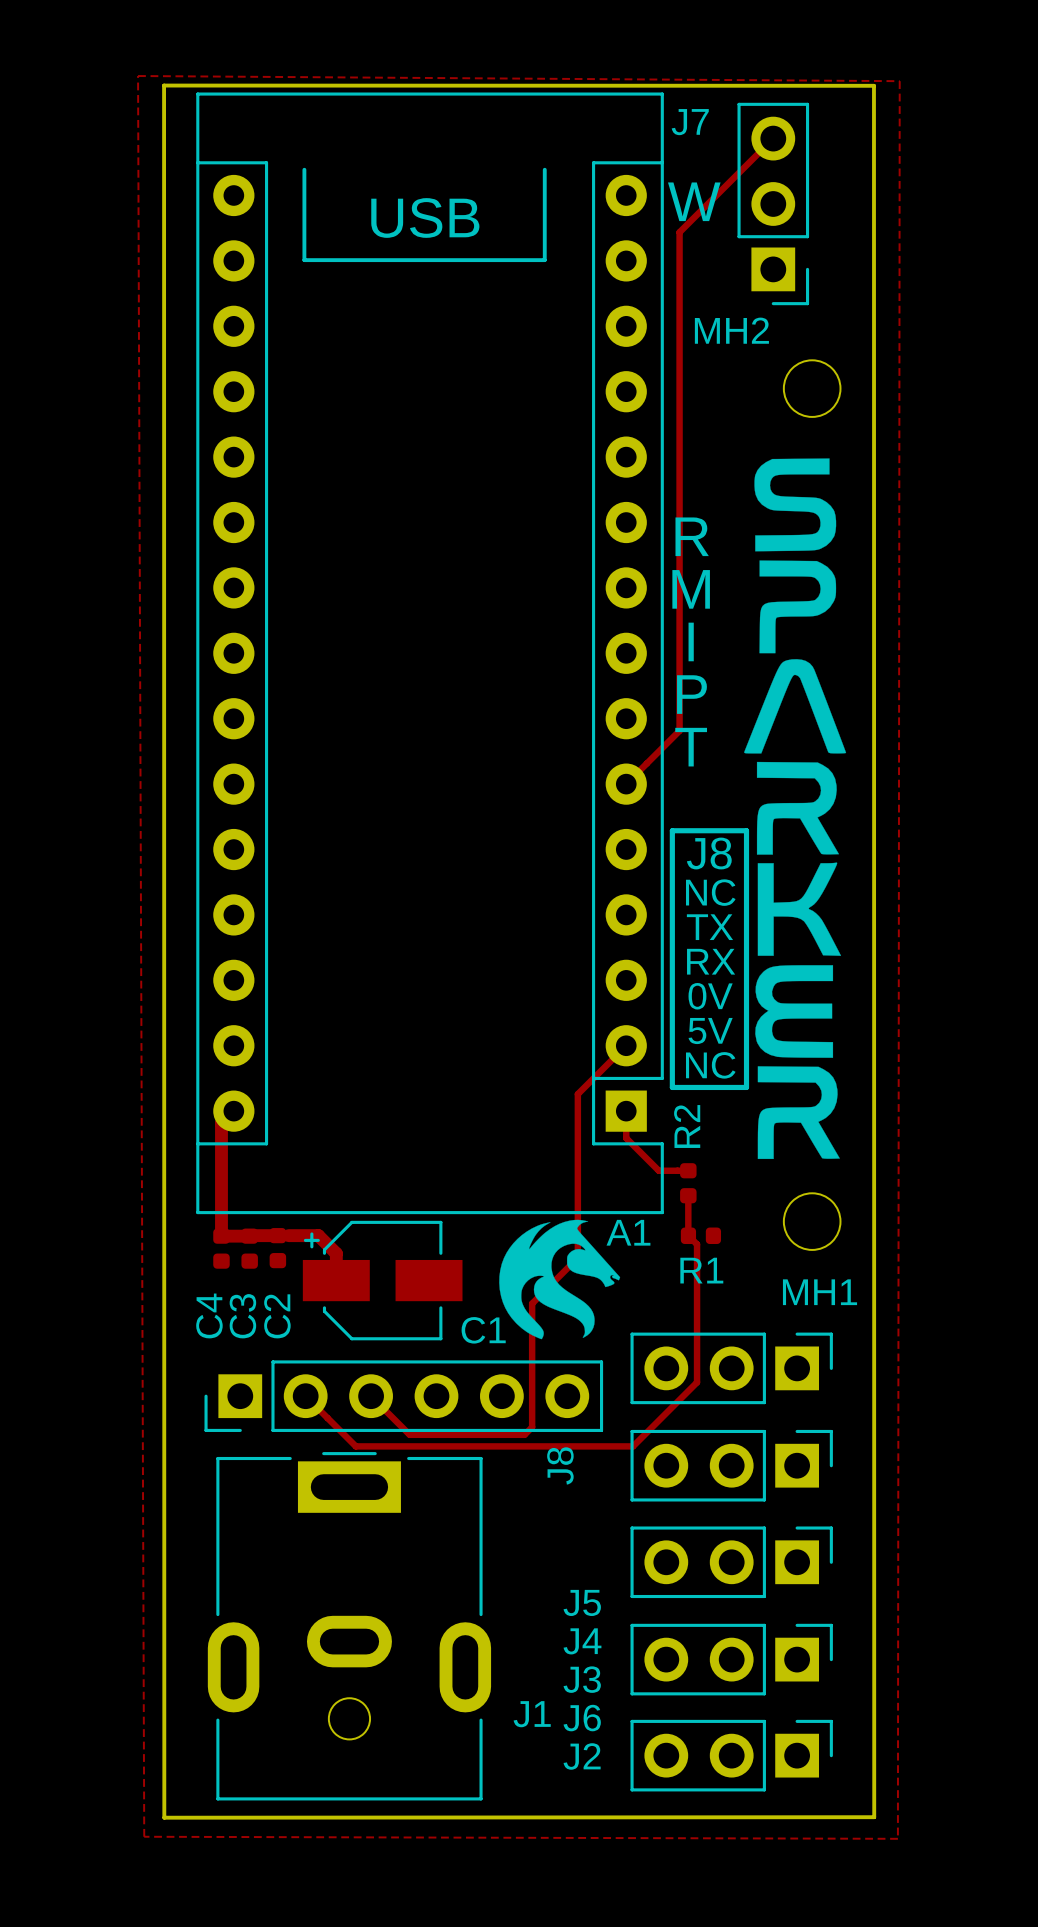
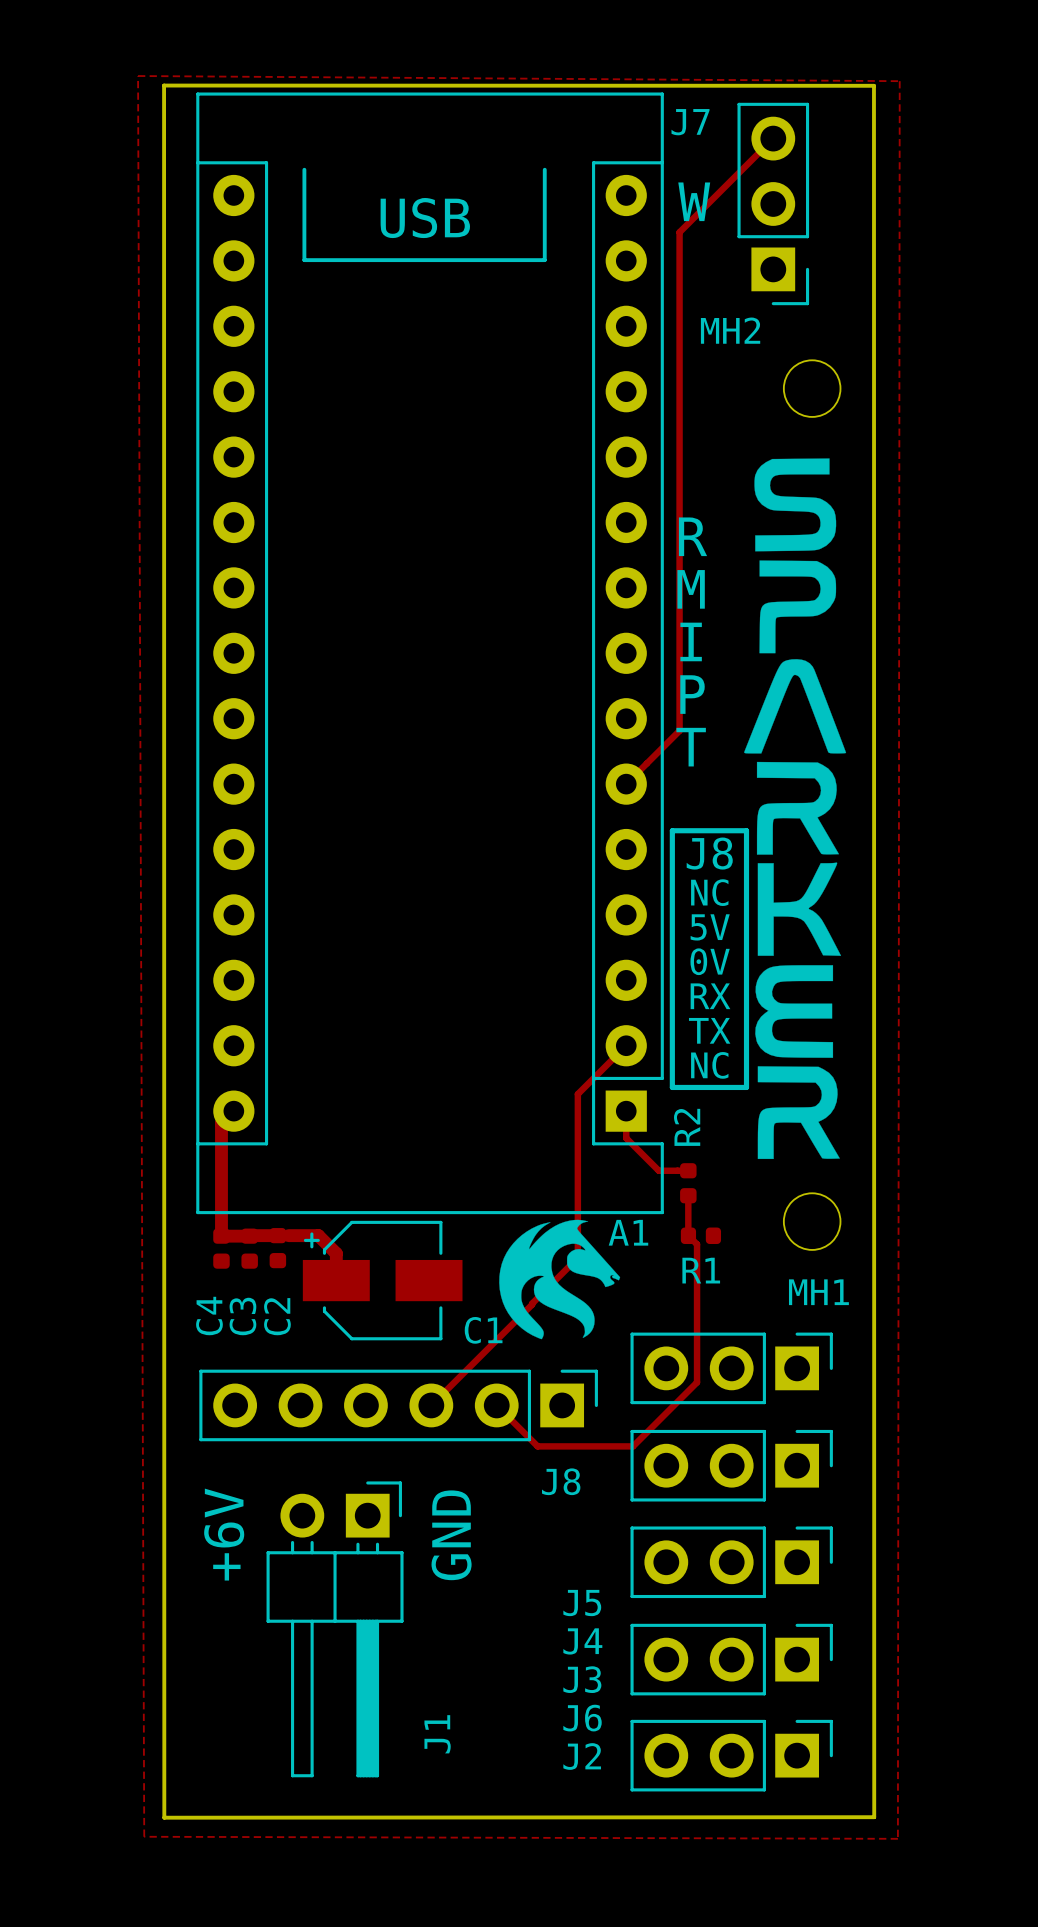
text: TX (709, 927) -> 5V (710, 927)
text: RX (711, 961) -> 0V (710, 961)
text: 0V (710, 996) -> RX (710, 996)
text: 5V (710, 1031) -> TX (709, 1030)
track: (532, 1304) (532, 1427) (524, 1434) (409, 1434) (371, 1396) -> (532, 1304) (431, 1405)
track: (305, 1396) (355, 1446) (537, 1446) -> (496, 1405) (537, 1446)
J8 rotation: 0° (403, 1396) -> 180° (398, 1405)
J1 footprint: [207, 1452, 492, 1801] -> [266, 1481, 404, 1778]
text: none -> +6V (224, 1534)
text: none -> GND (451, 1535)
J1 name position: J1 (532, 1714) -> J1 (437, 1734)

